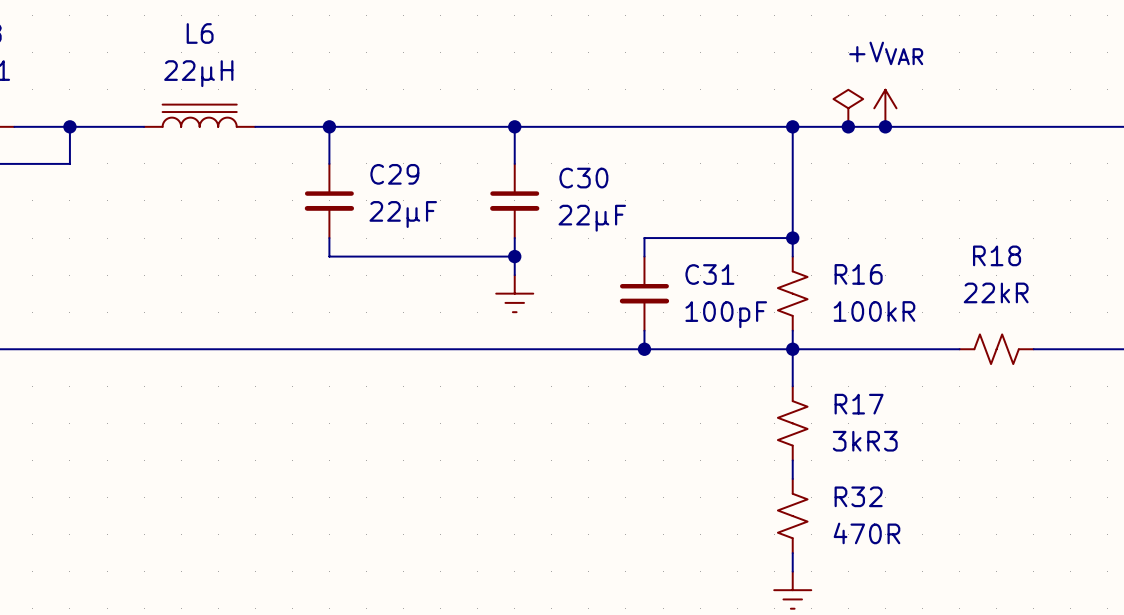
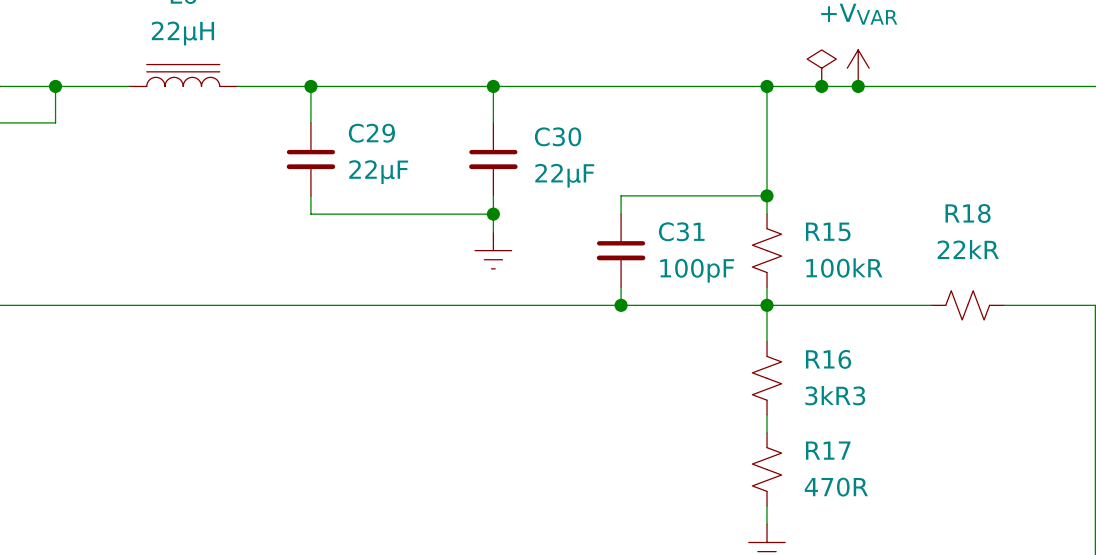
R16 name: R16 (858, 274) -> R15 (828, 231)
R17 name: R17 (859, 404) -> R16 (828, 359)
R32 name: R32 (858, 496) -> R17 (828, 450)

